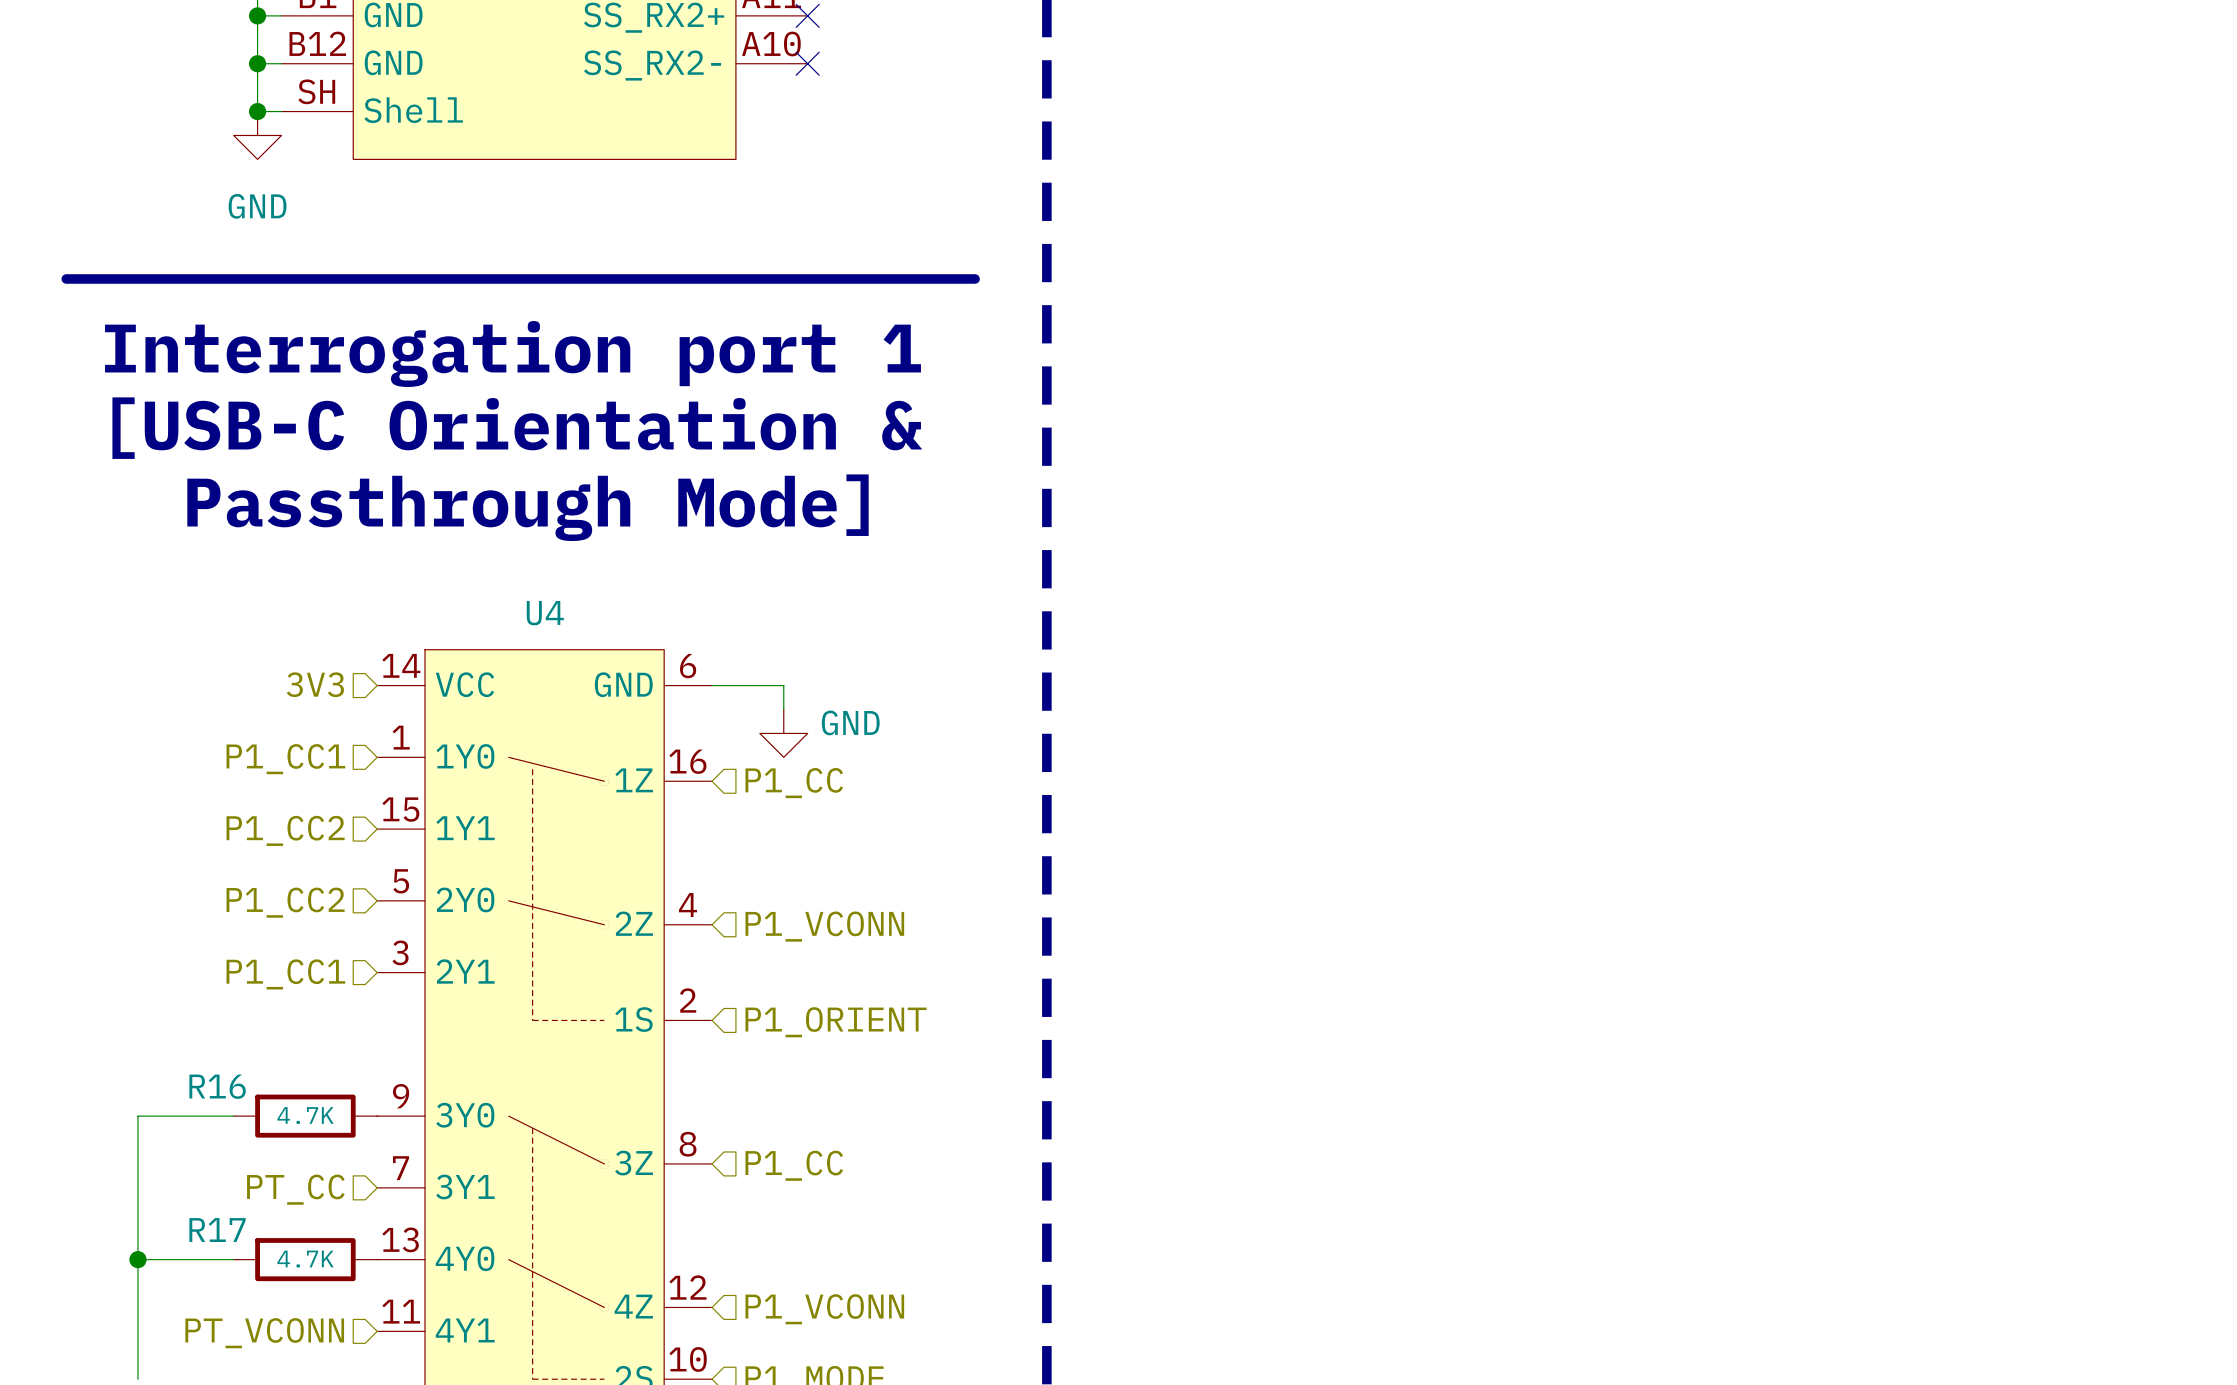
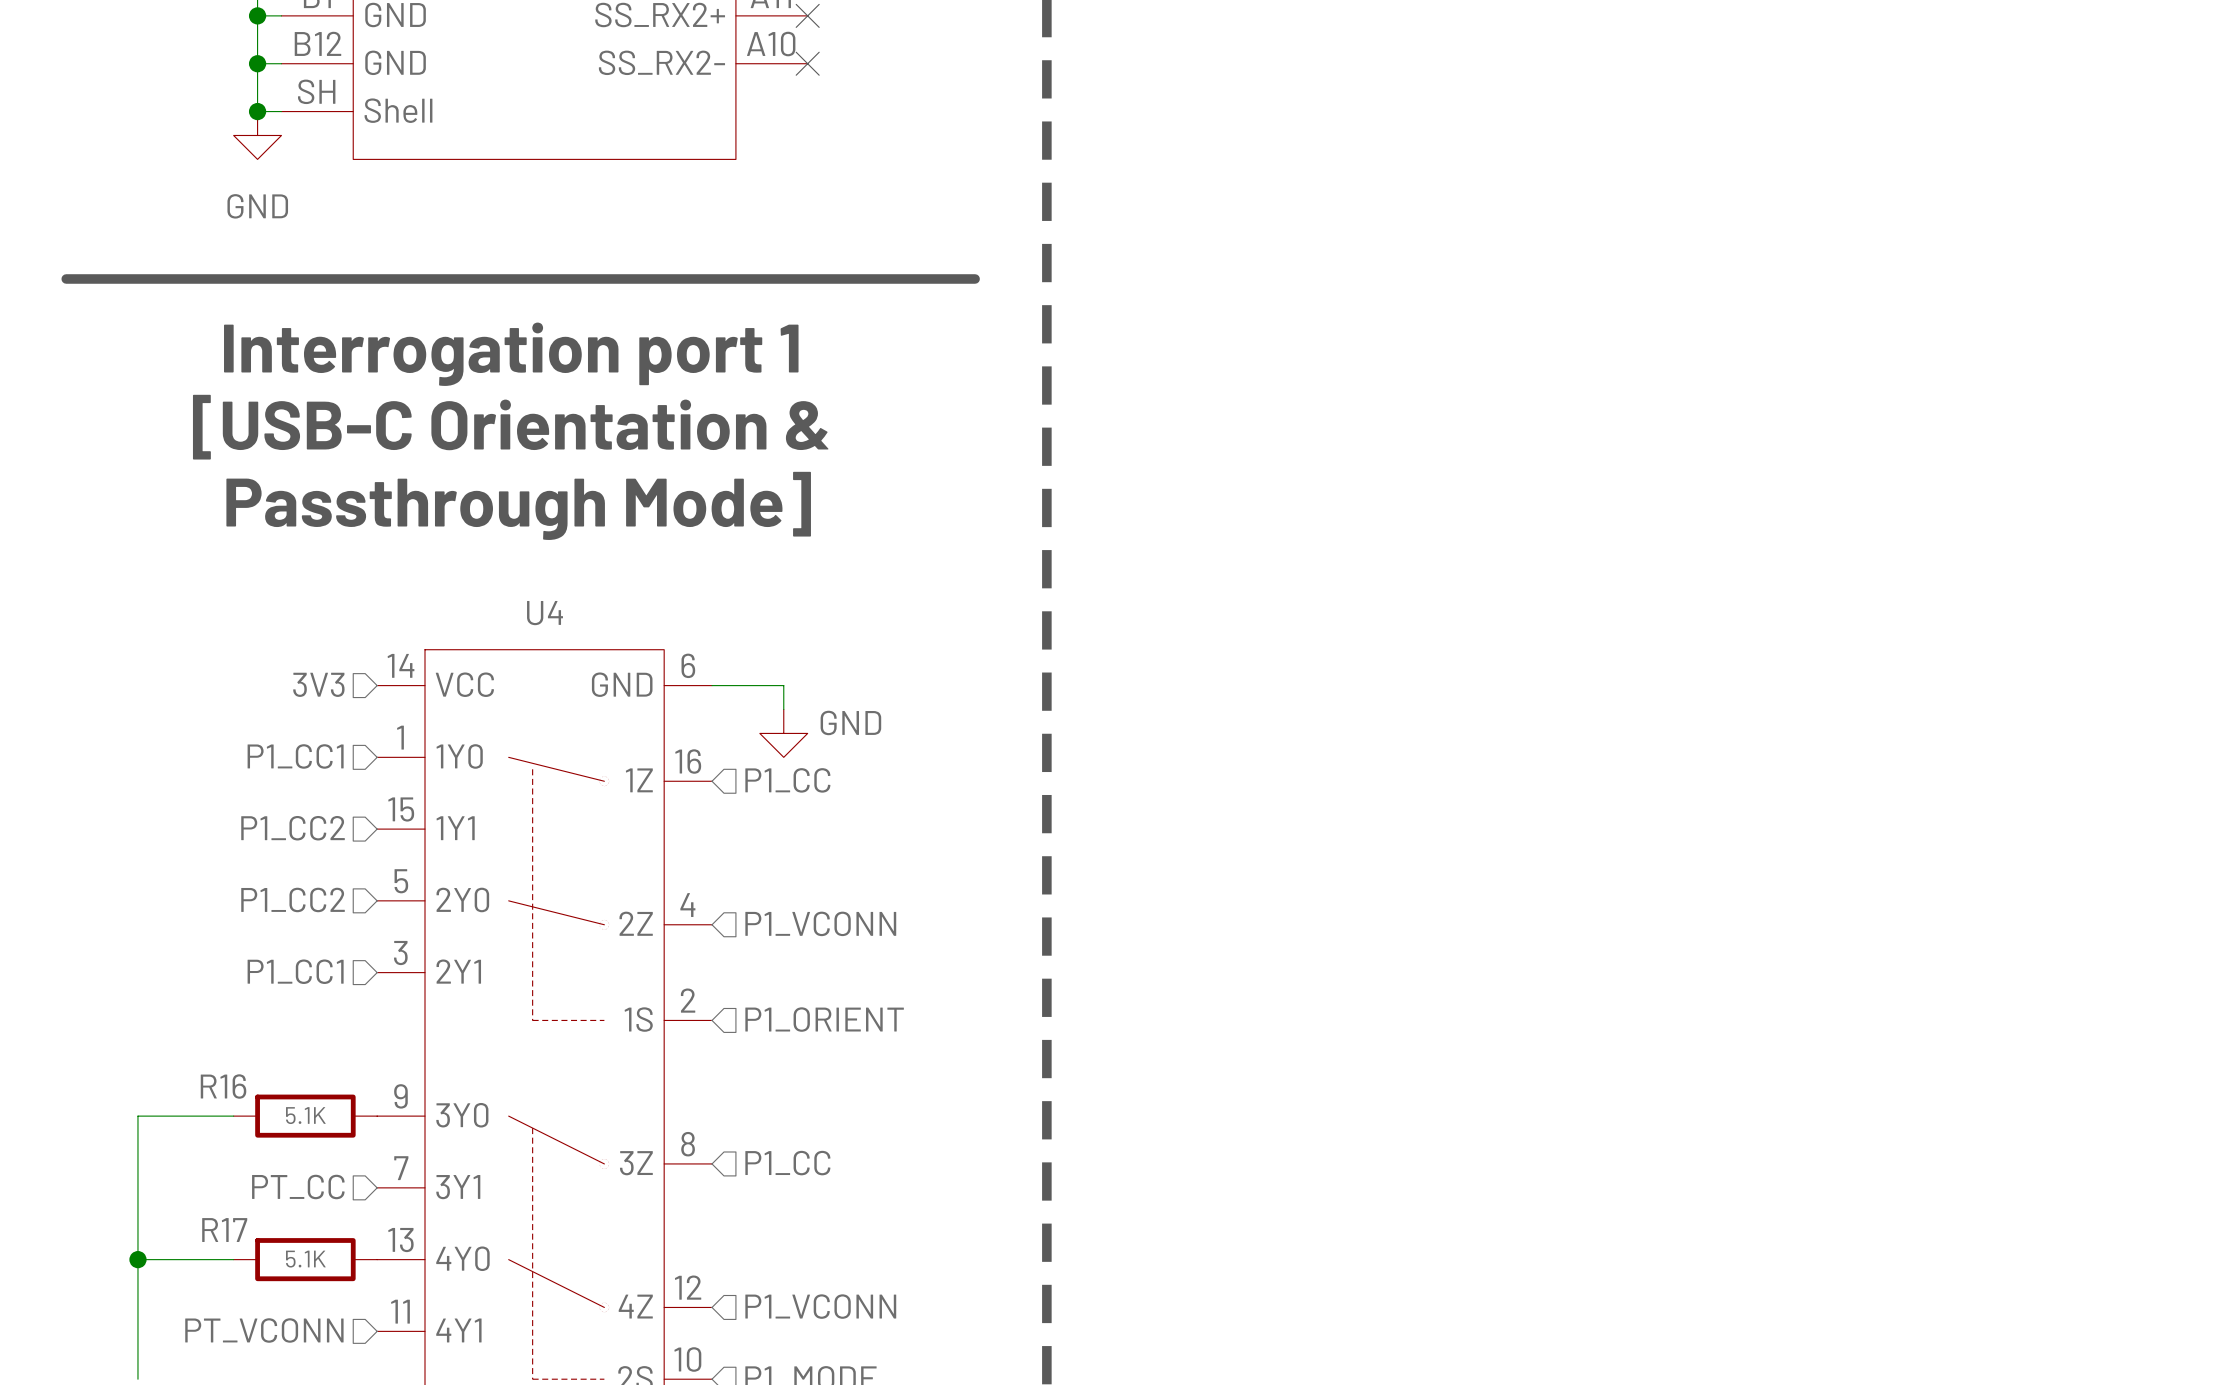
R16 value: 4.7K (305, 1115) -> 5.1K (305, 1115)
R17 value: 4.7K (305, 1259) -> 5.1K (305, 1259)

